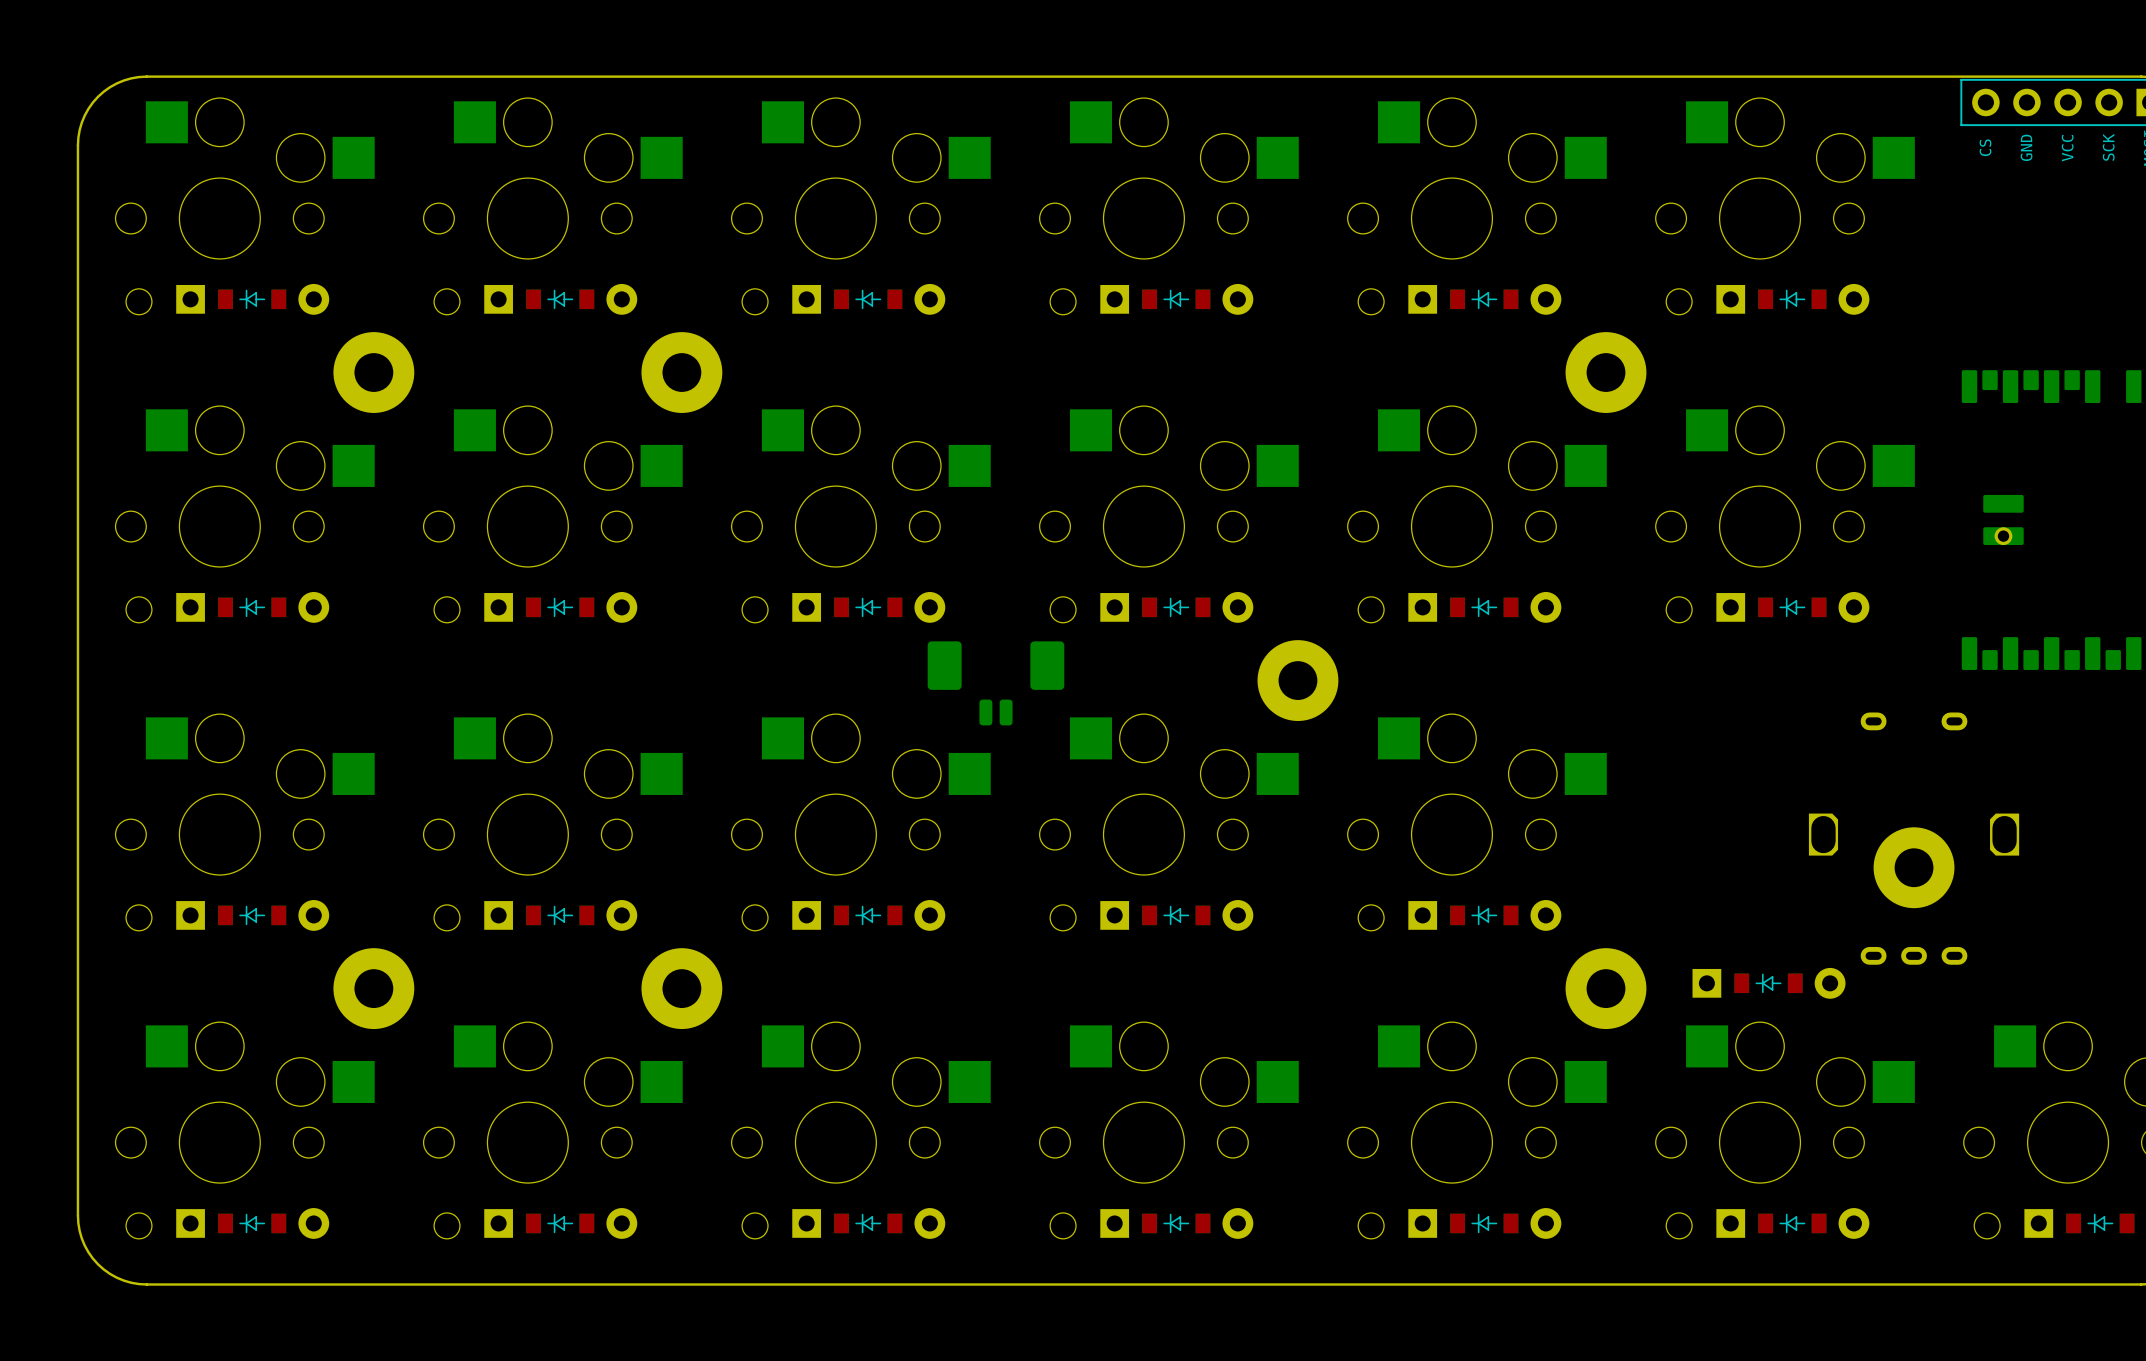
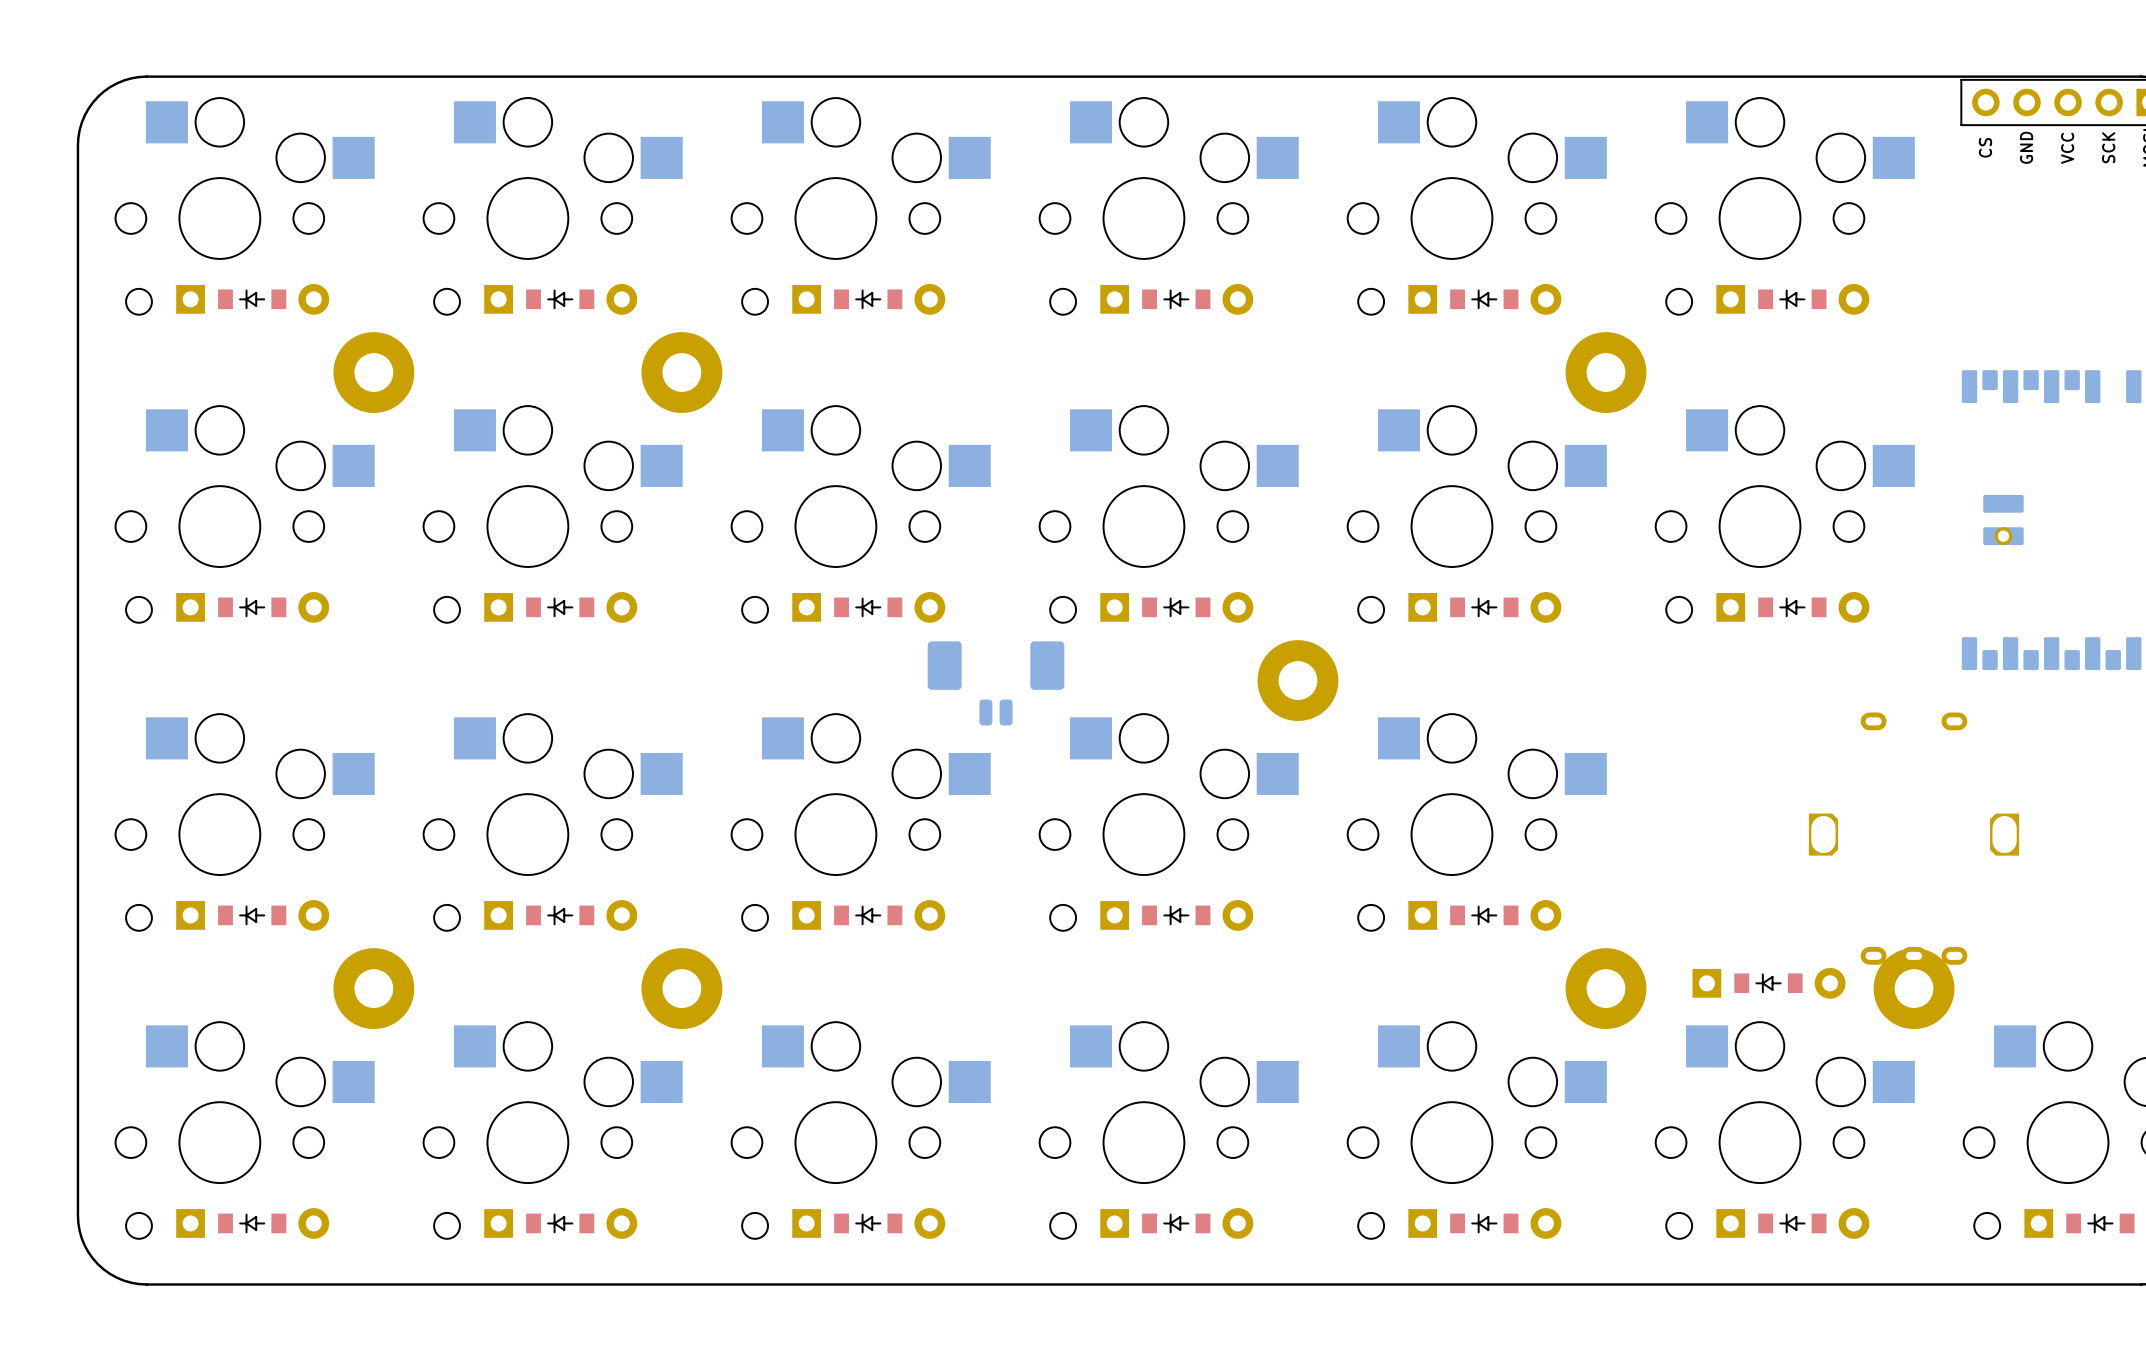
part position: (1914, 867) -> (1914, 988)

